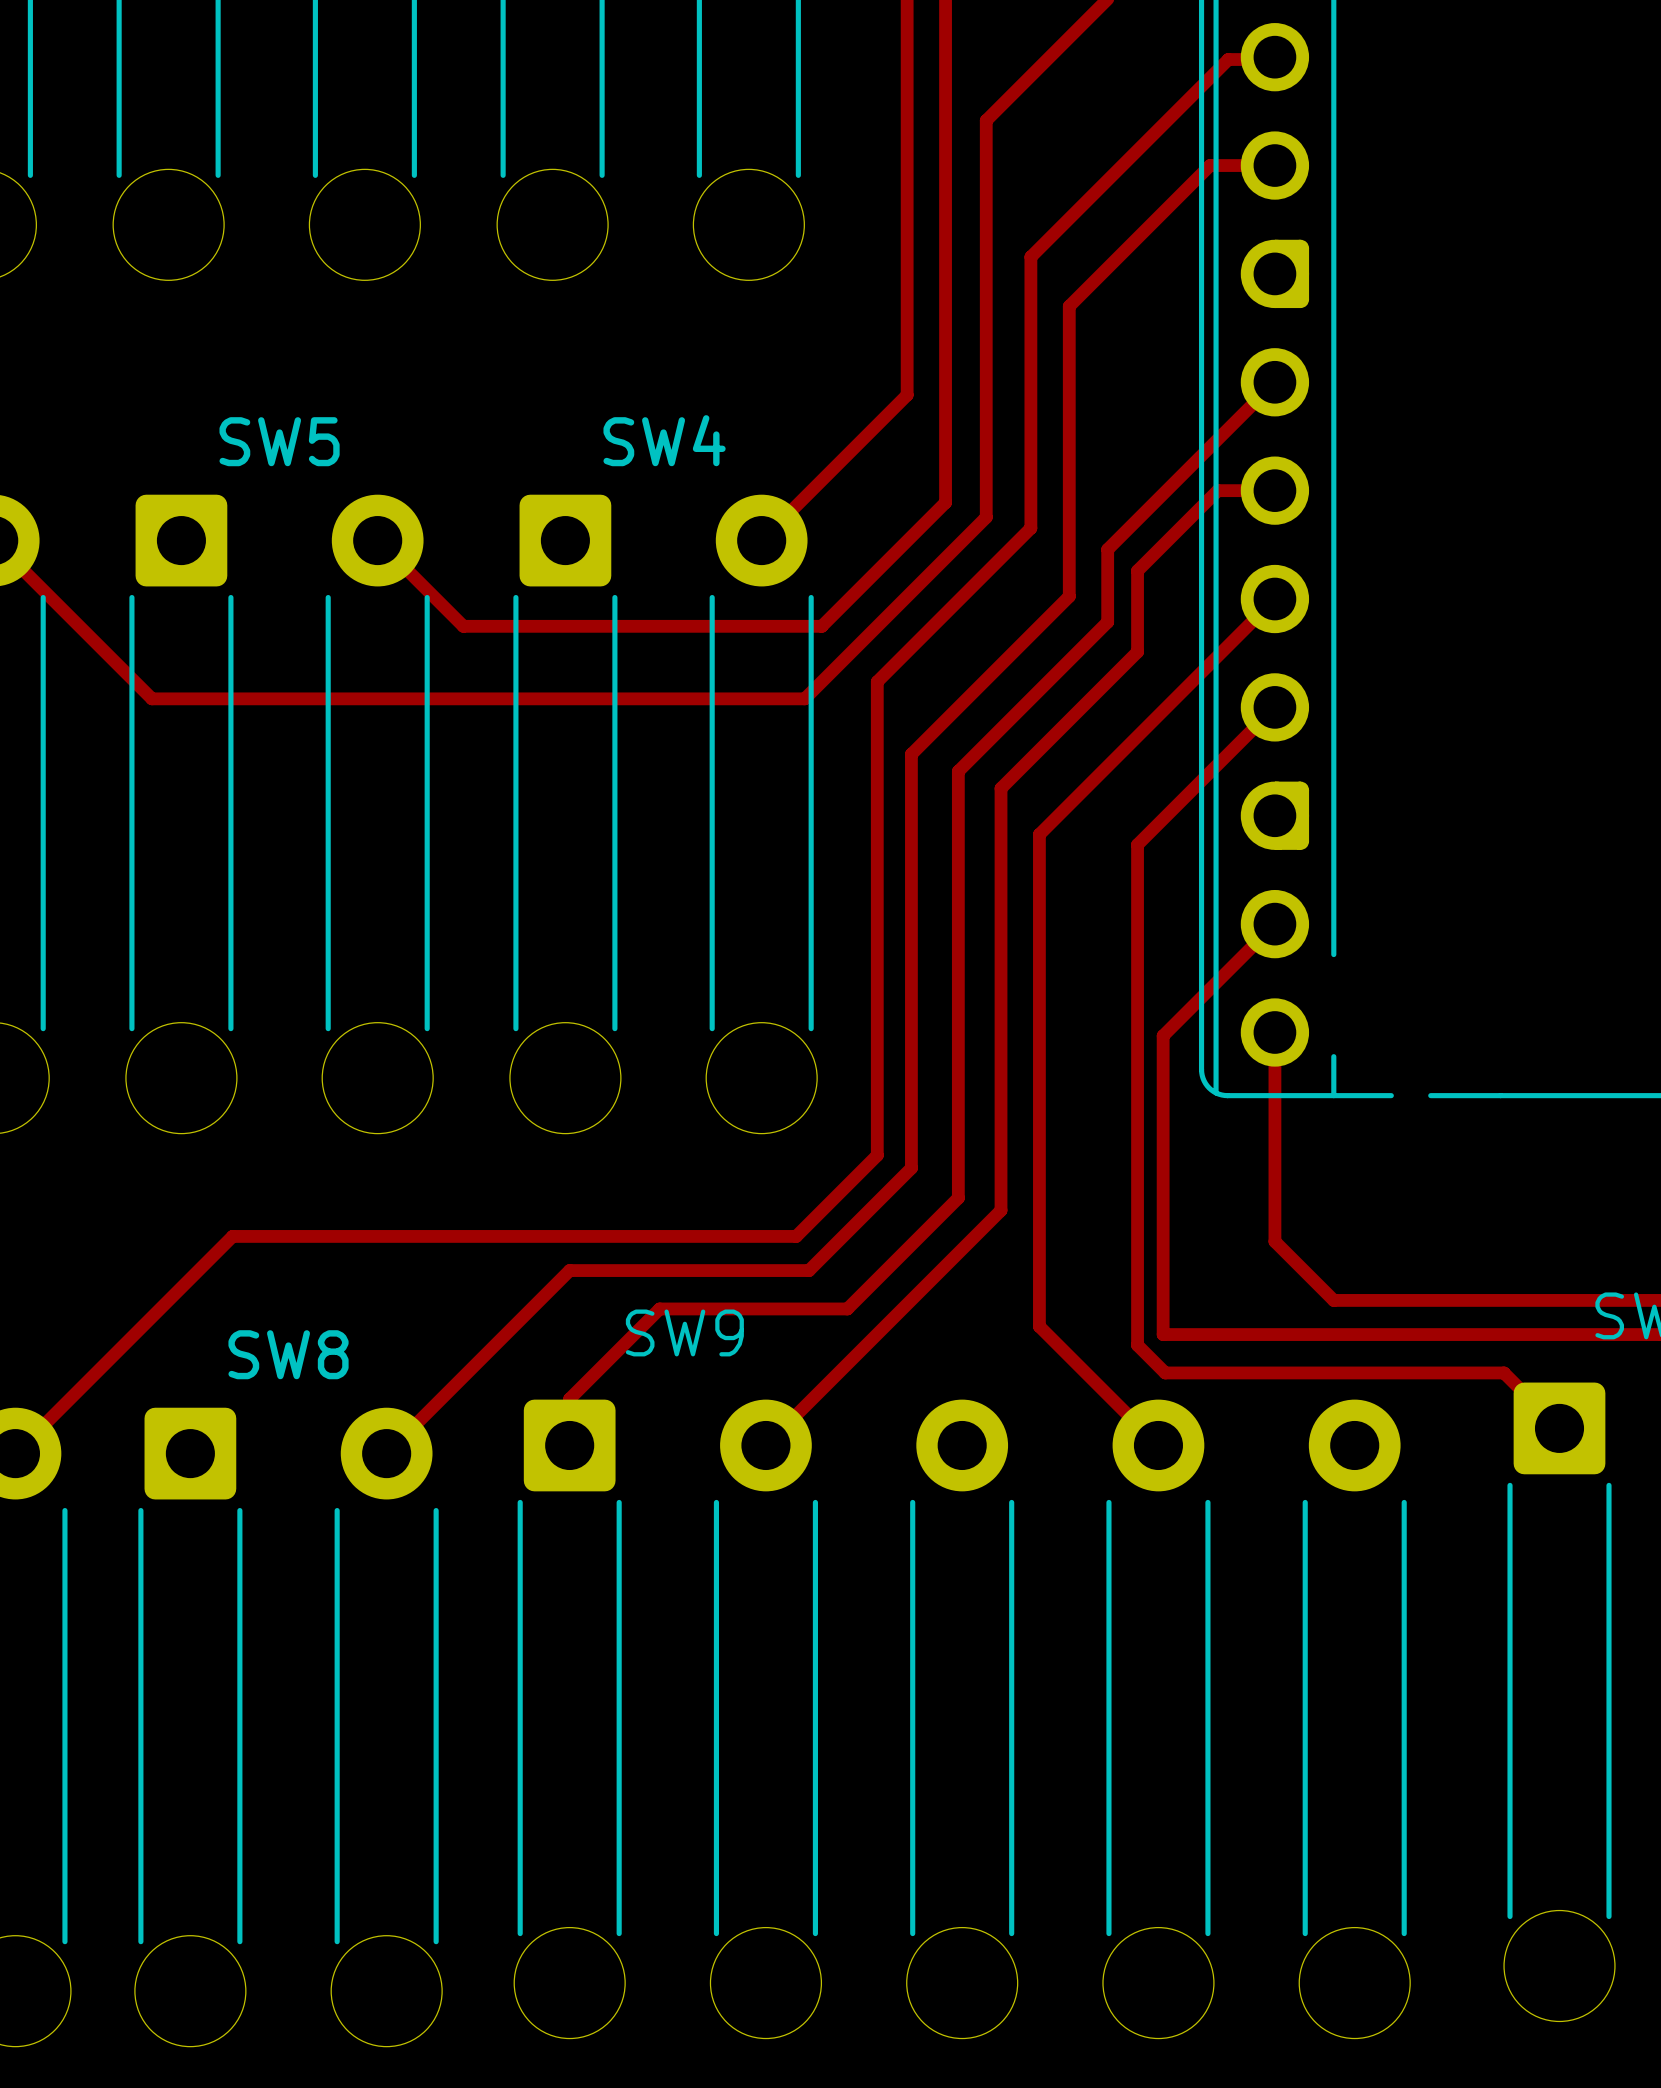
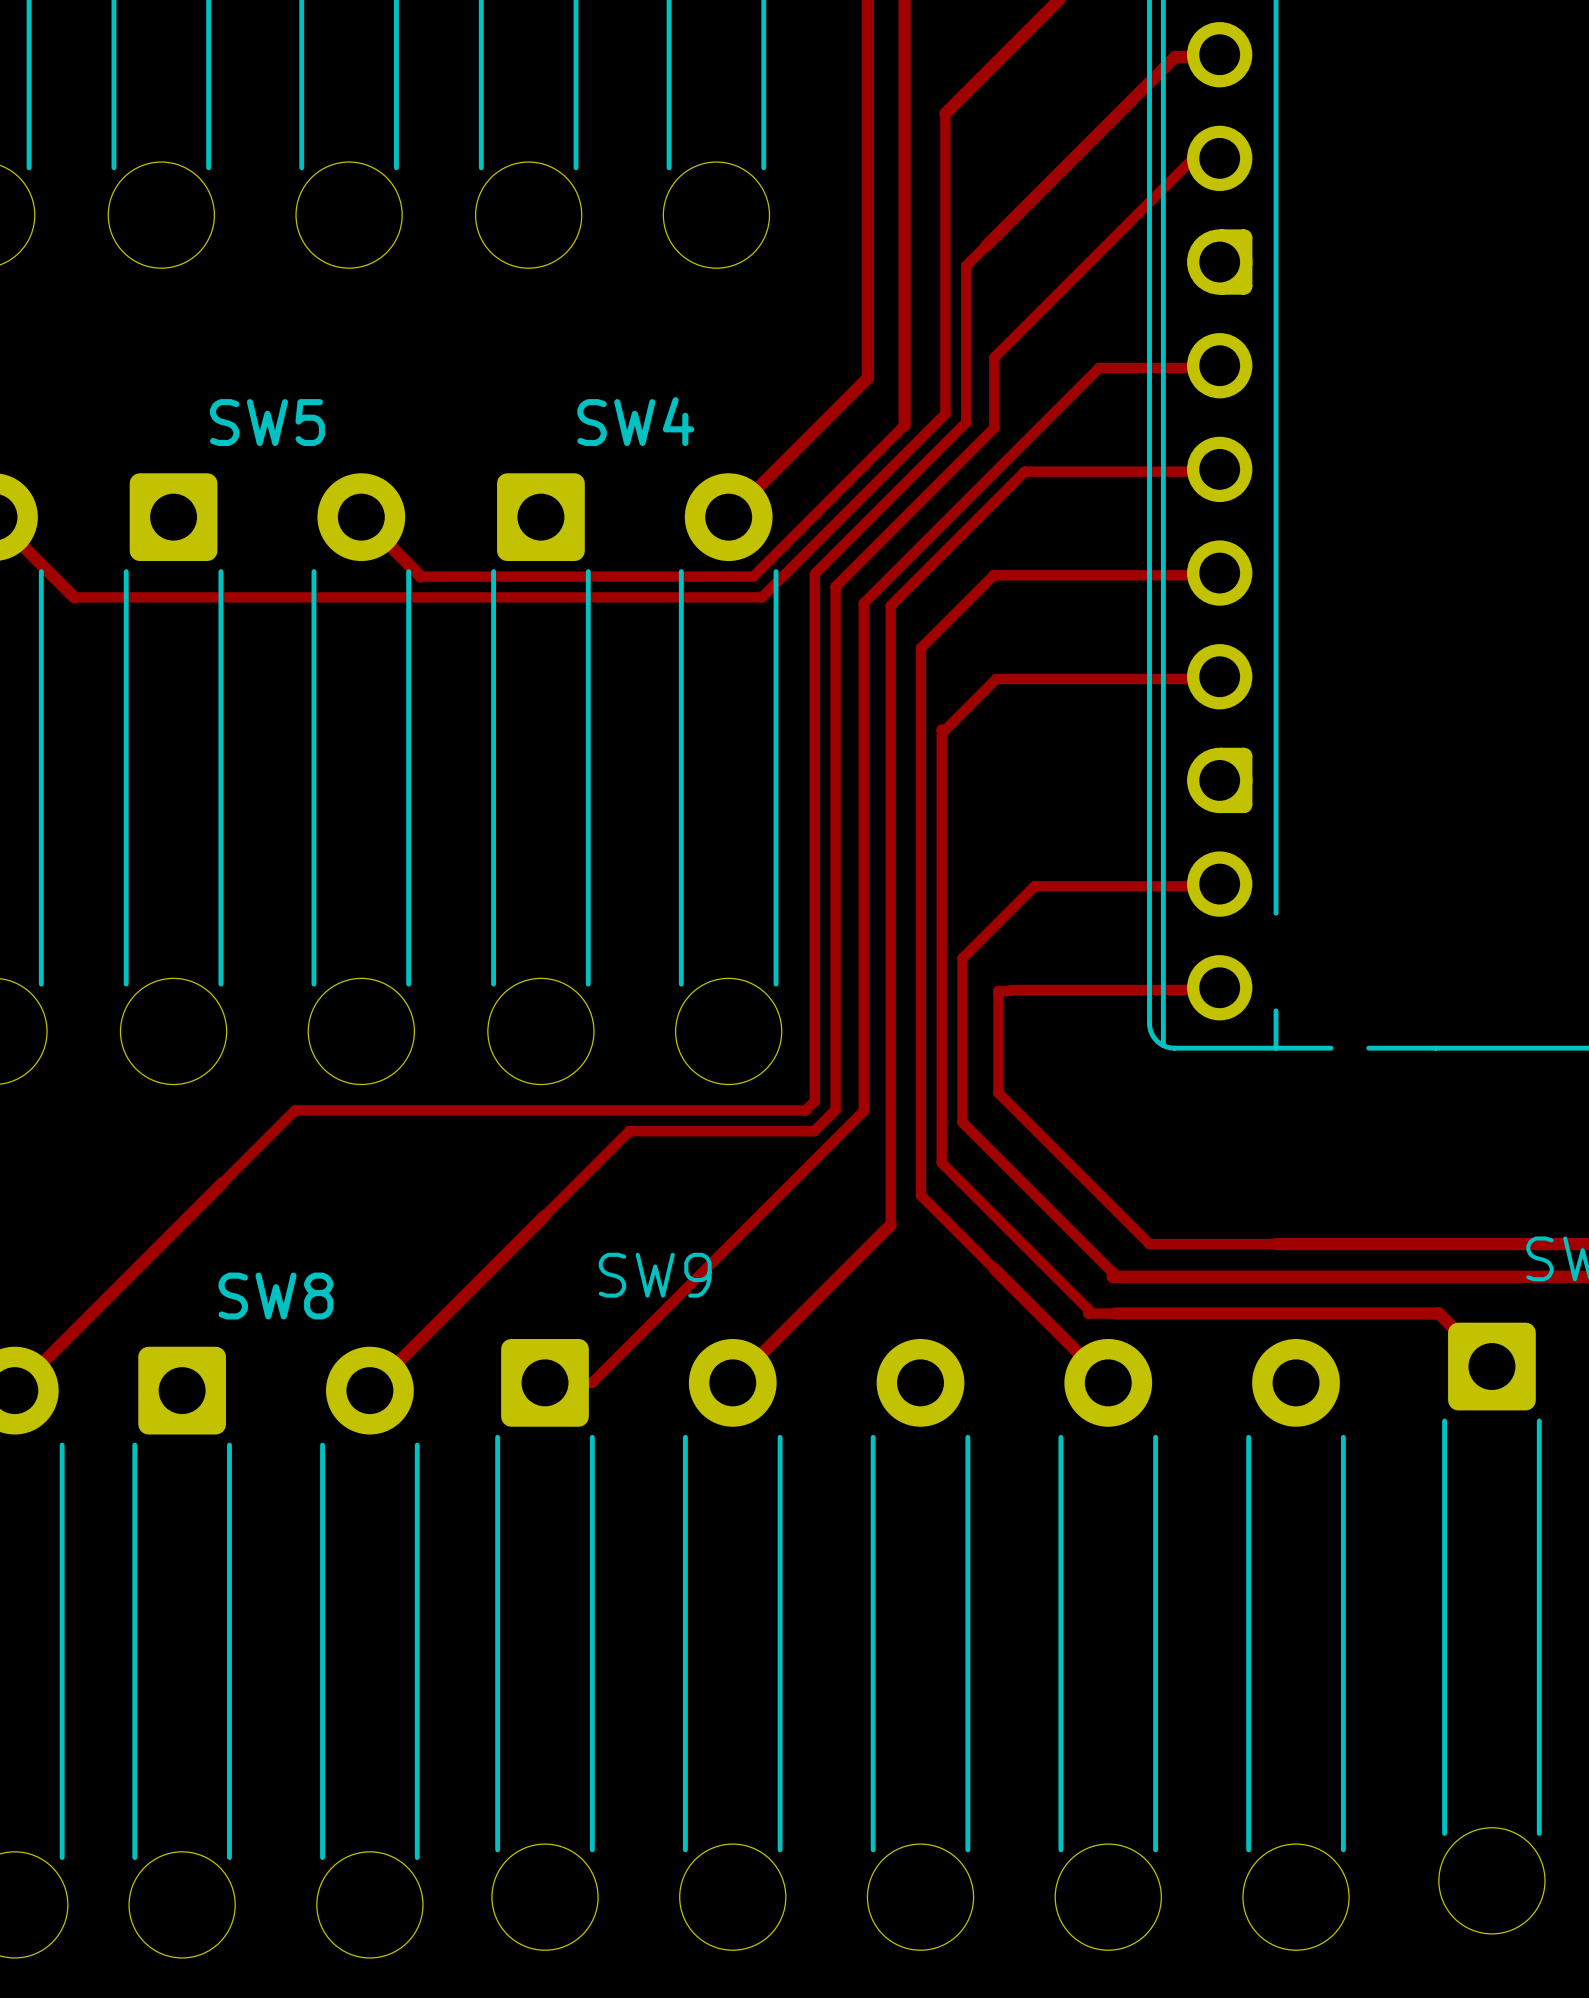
track: (988, 118) (986, 120) (986, 517) (804, 698) (151, 698) (77, 624) -> (945, 113) (945, 413) (761, 597) (74, 597)
track: (1274, 165) (1210, 165) (1069, 306) (1069, 596) (911, 754) (911, 1168) (809, 1270) (569, 1270) -> (1221, 160) (1191, 160) (994, 357) (994, 427) (835, 586) (835, 1109) (814, 1131) (629, 1131) (545, 1215)
track: (1030, 257) (1030, 528) (877, 681) (877, 1155) (796, 1236) (232, 1236) -> (986, 245) (966, 265) (966, 422) (814, 573) (814, 1101) (805, 1110) (294, 1110) (222, 1182)
track: (1274, 382) (1107, 549) (1107, 622) (958, 771) (958, 1198) (847, 1308) (659, 1308) (569, 1398) (569, 1445) -> (1221, 367) (1099, 367) (863, 603) (863, 1111) (591, 1382) (545, 1382)
track: (945, 444) (945, 502) (821, 626) (463, 626) (439, 602) -> (904, 425) (753, 576) (420, 576)
track: (1274, 490) (1217, 490) (1137, 570) (1137, 651) (1001, 788) (1001, 1210) (931, 1280) -> (1221, 471) (1024, 471) (890, 605) (890, 1224)
track: (1274, 599) (1039, 834) (1039, 1326) -> (1221, 575) (993, 575) (920, 648) (920, 1195) (994, 1268)
track: (1274, 707) (1137, 844) (1137, 1345) (1165, 1372) -> (1221, 678) (996, 678) (945, 729) (941, 729) (941, 1162) (1088, 1309) (1088, 1313) (1114, 1313)
track: (1274, 924) (1163, 1035) (1163, 1330) -> (1221, 886) (1034, 886) (962, 958) (962, 1122) (1112, 1272)
track: (1274, 1032) (1274, 1241) (1333, 1300) -> (1221, 990) (998, 991) (998, 1093) (1149, 1244) (1276, 1244)

